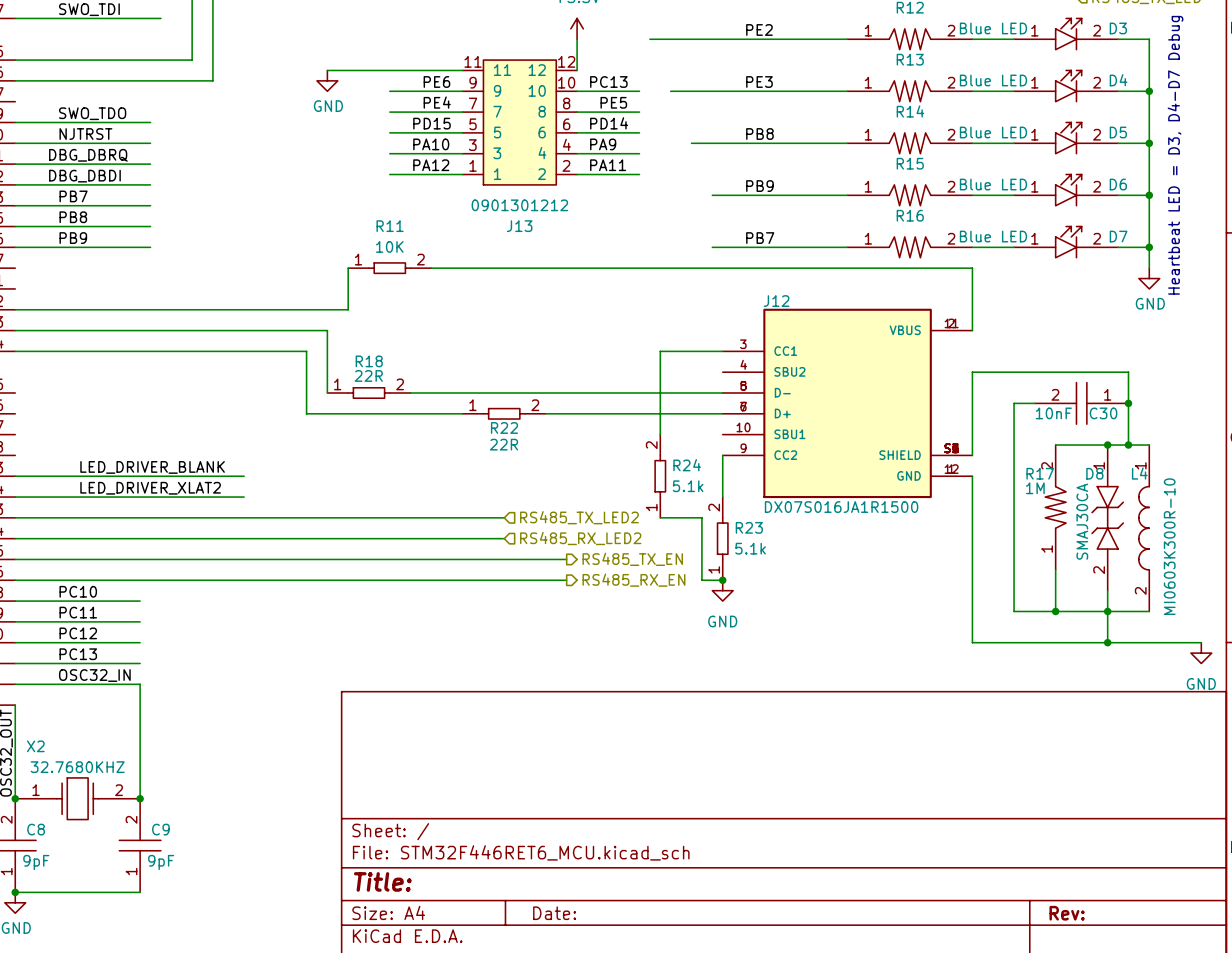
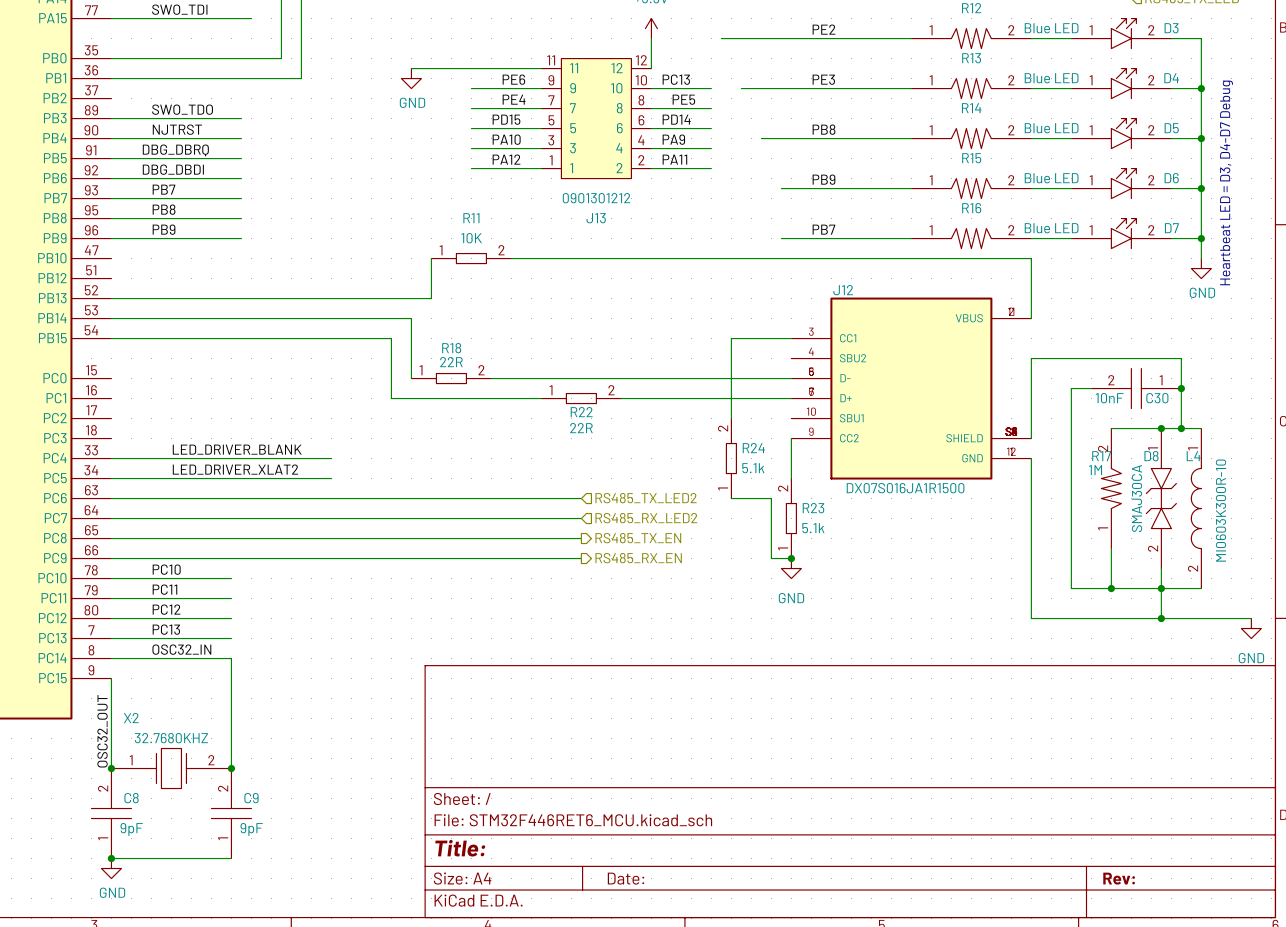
wire: (504, 559) (566, 559) -> none
hierarchical label position: RS485_TX_EN (632, 559) -> RS485_TX_EN (638, 538)
wire: (504, 580) (566, 580) -> none
hierarchical label position: RS485_RX_EN (633, 580) -> RS485_RX_EN (638, 558)

